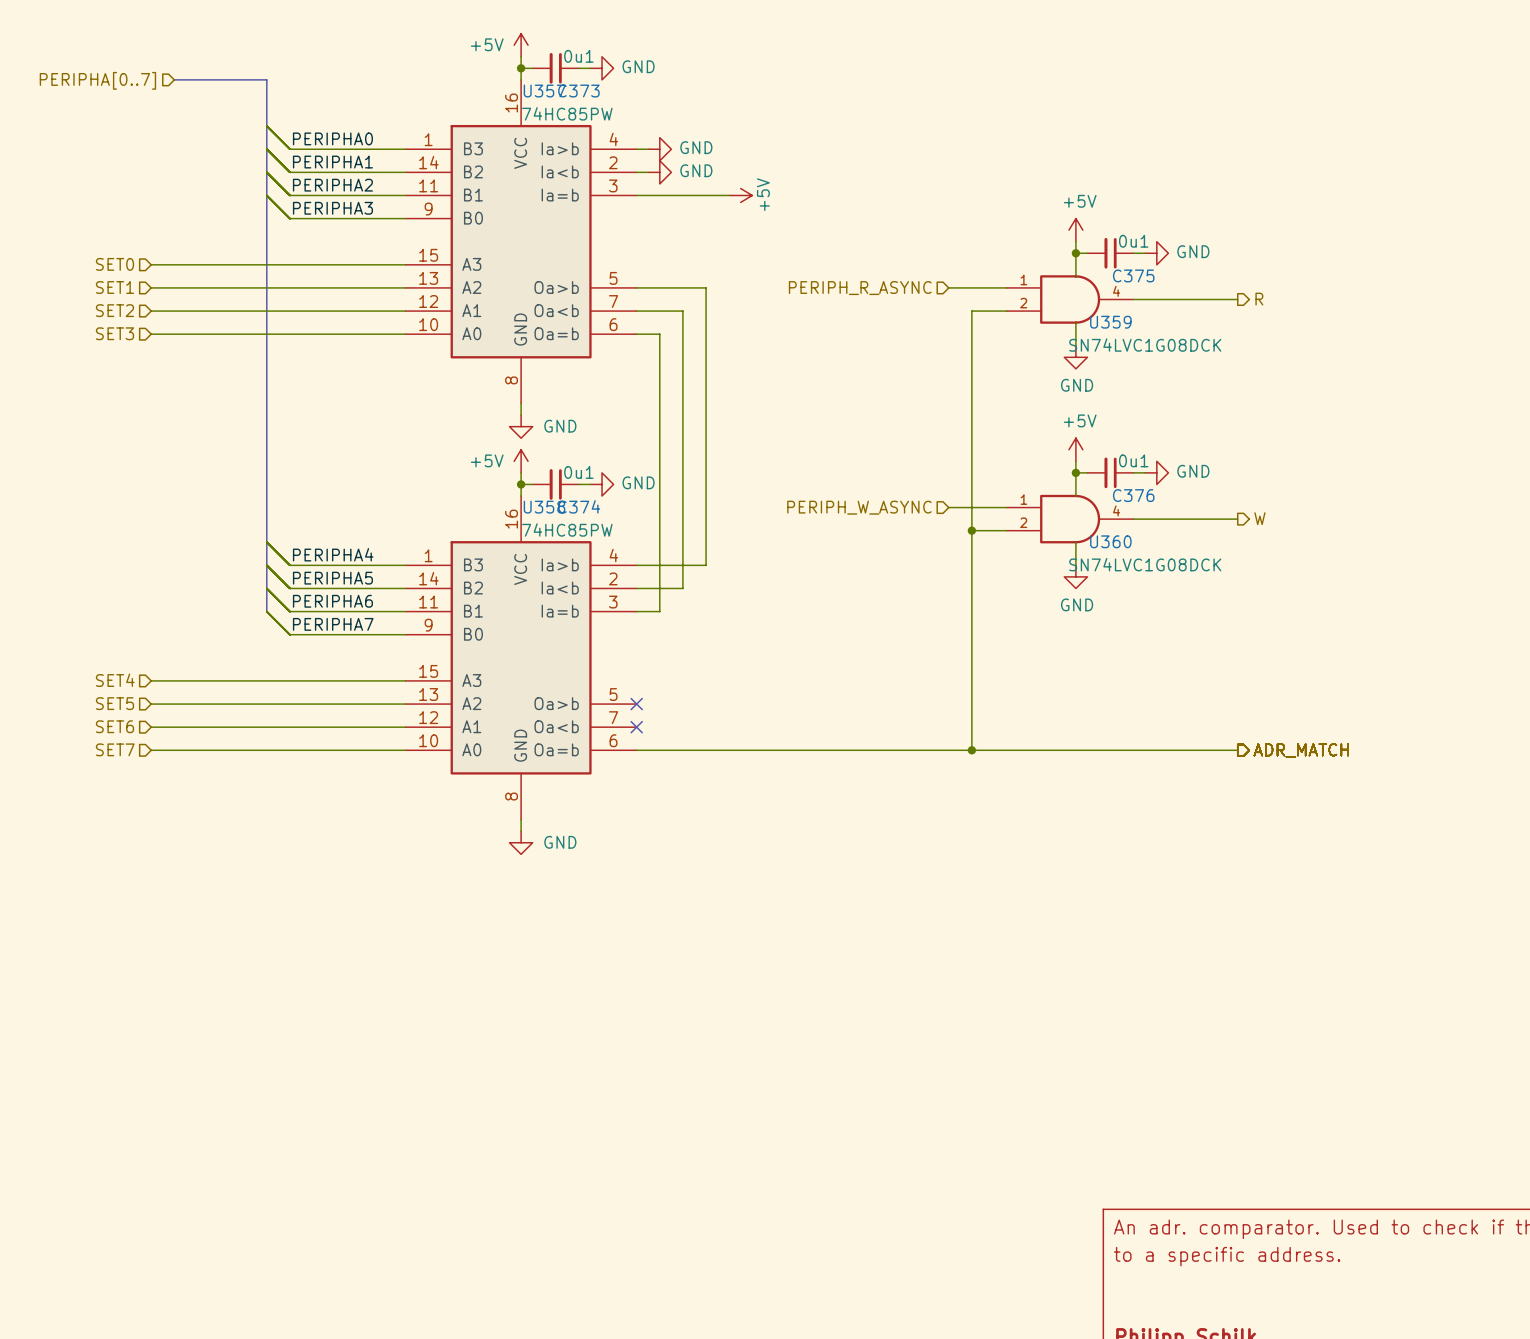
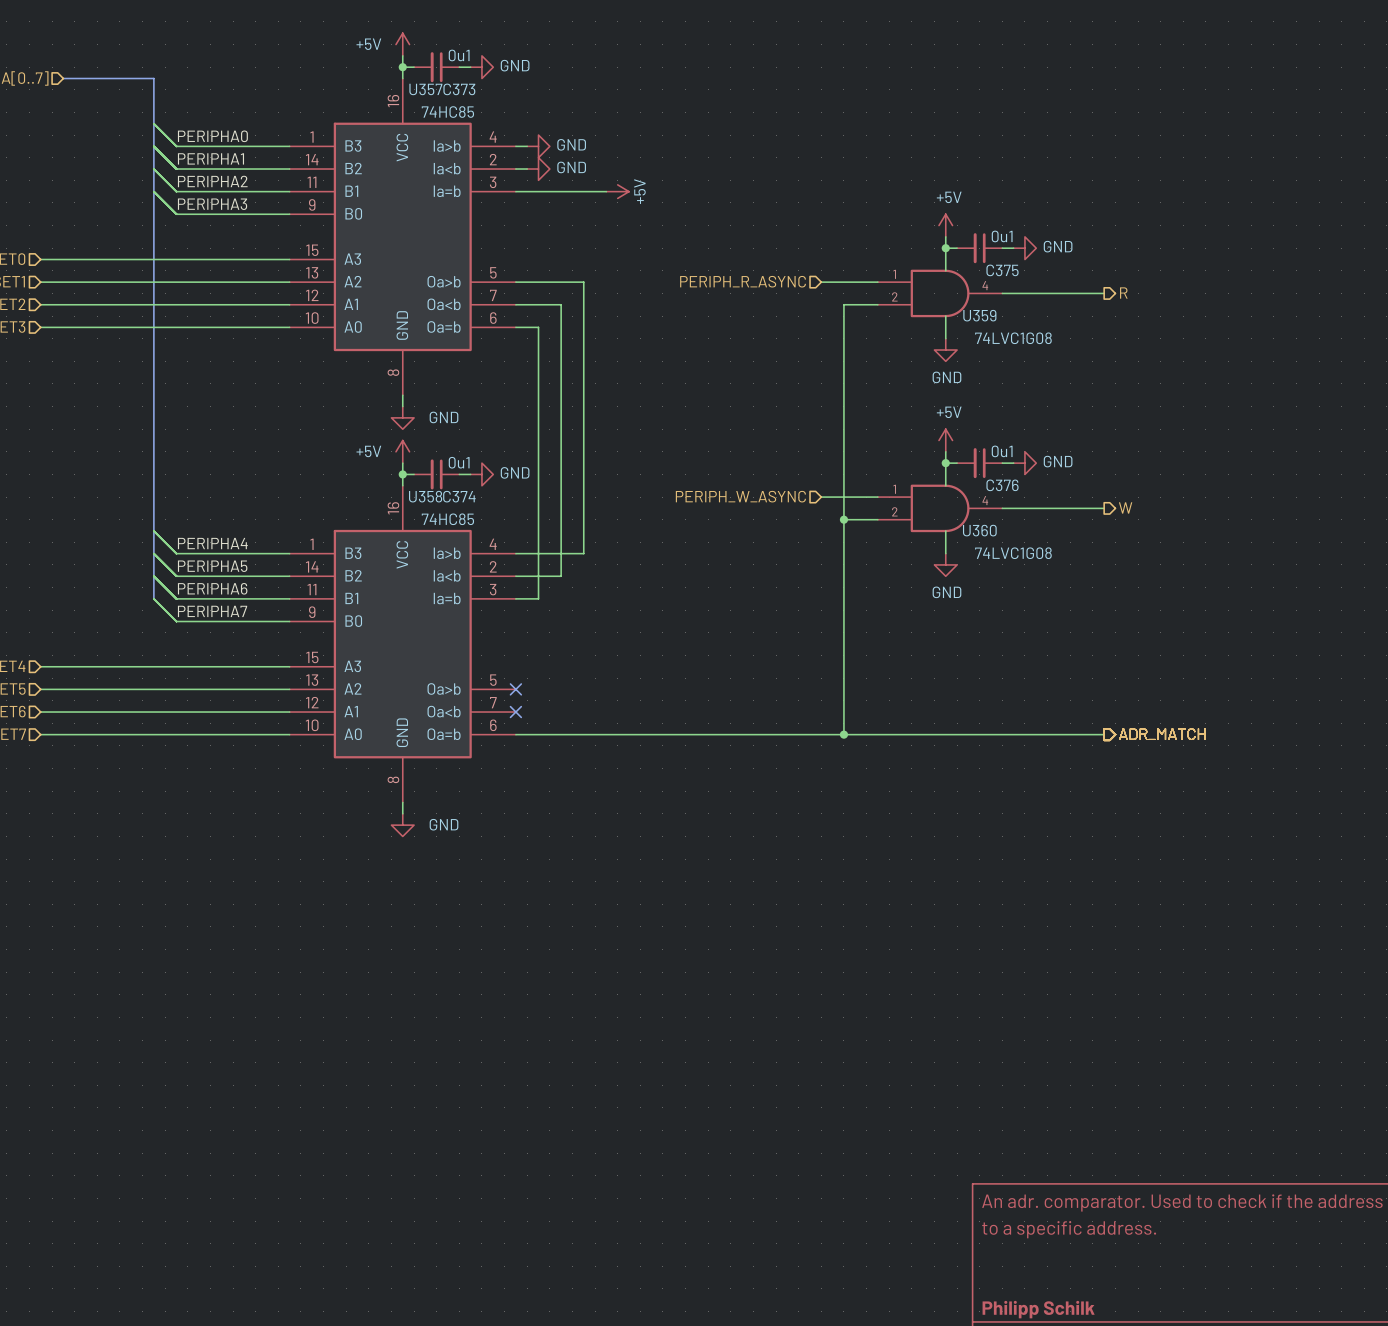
U357 value: 74HC85PW (567, 113) -> 74HC85 (447, 112)
U359 value: SN74LVC1G08DCK (1145, 345) -> 74LVC1G08 (1013, 338)
U358 value: 74HC85PW (567, 529) -> 74HC85 (447, 519)
U360 value: SN74LVC1G08DCK (1145, 564) -> 74LVC1G08 (1013, 553)

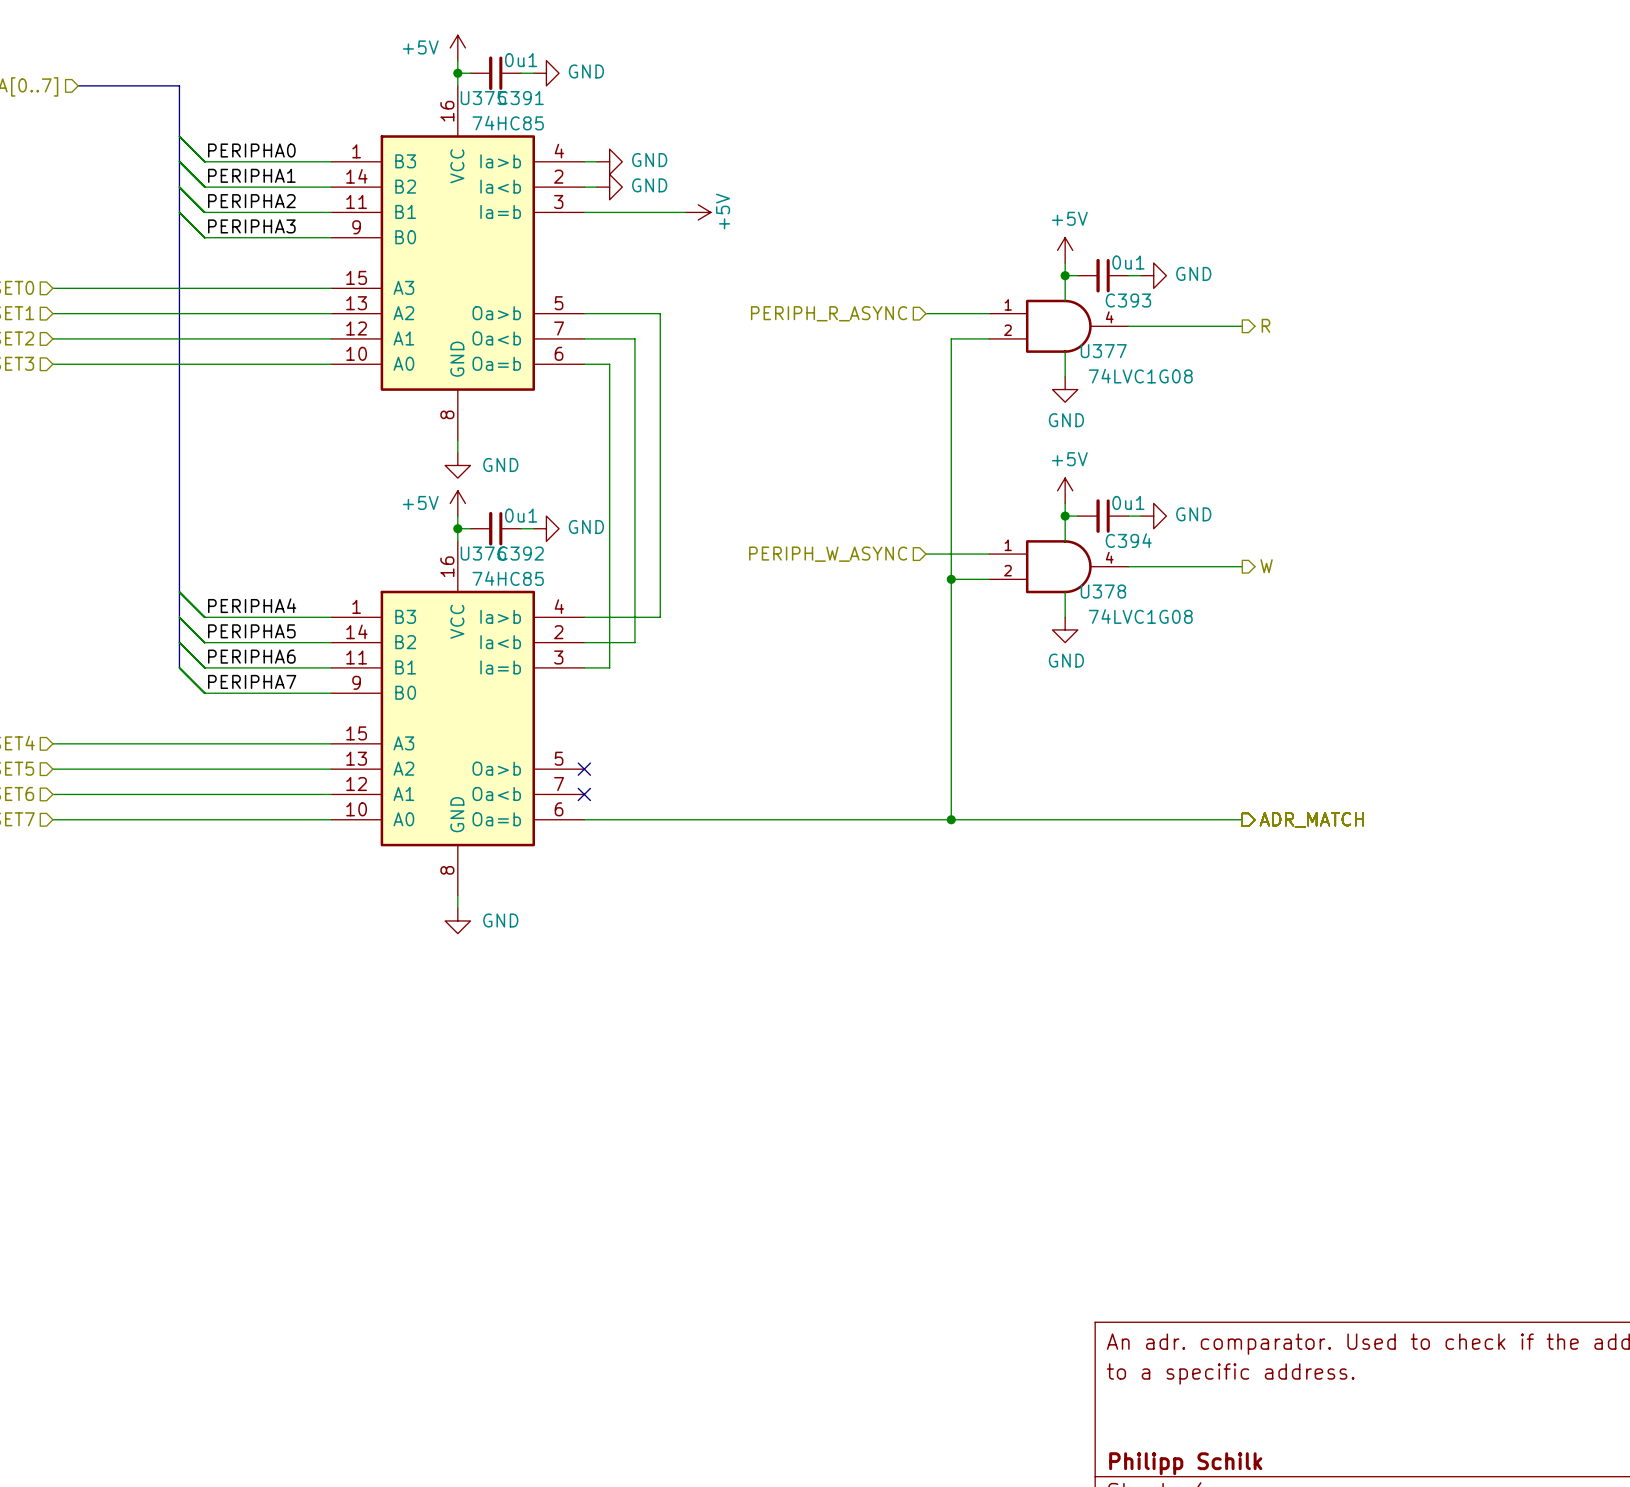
U357 name: U357 (425, 89) -> U375 (483, 98)
C373 name: C373 (459, 89) -> C391 (521, 98)
C375 name: C375 (1002, 270) -> C393 (1128, 300)
U359 name: U359 (979, 315) -> U377 (1103, 351)
C376 name: C376 (1002, 485) -> C394 (1128, 540)
U358 name: U358 (425, 496) -> U376 (483, 553)
C374 name: C374 (459, 496) -> C392 (521, 553)
U360 name: U360 (979, 530) -> U378 (1103, 591)

